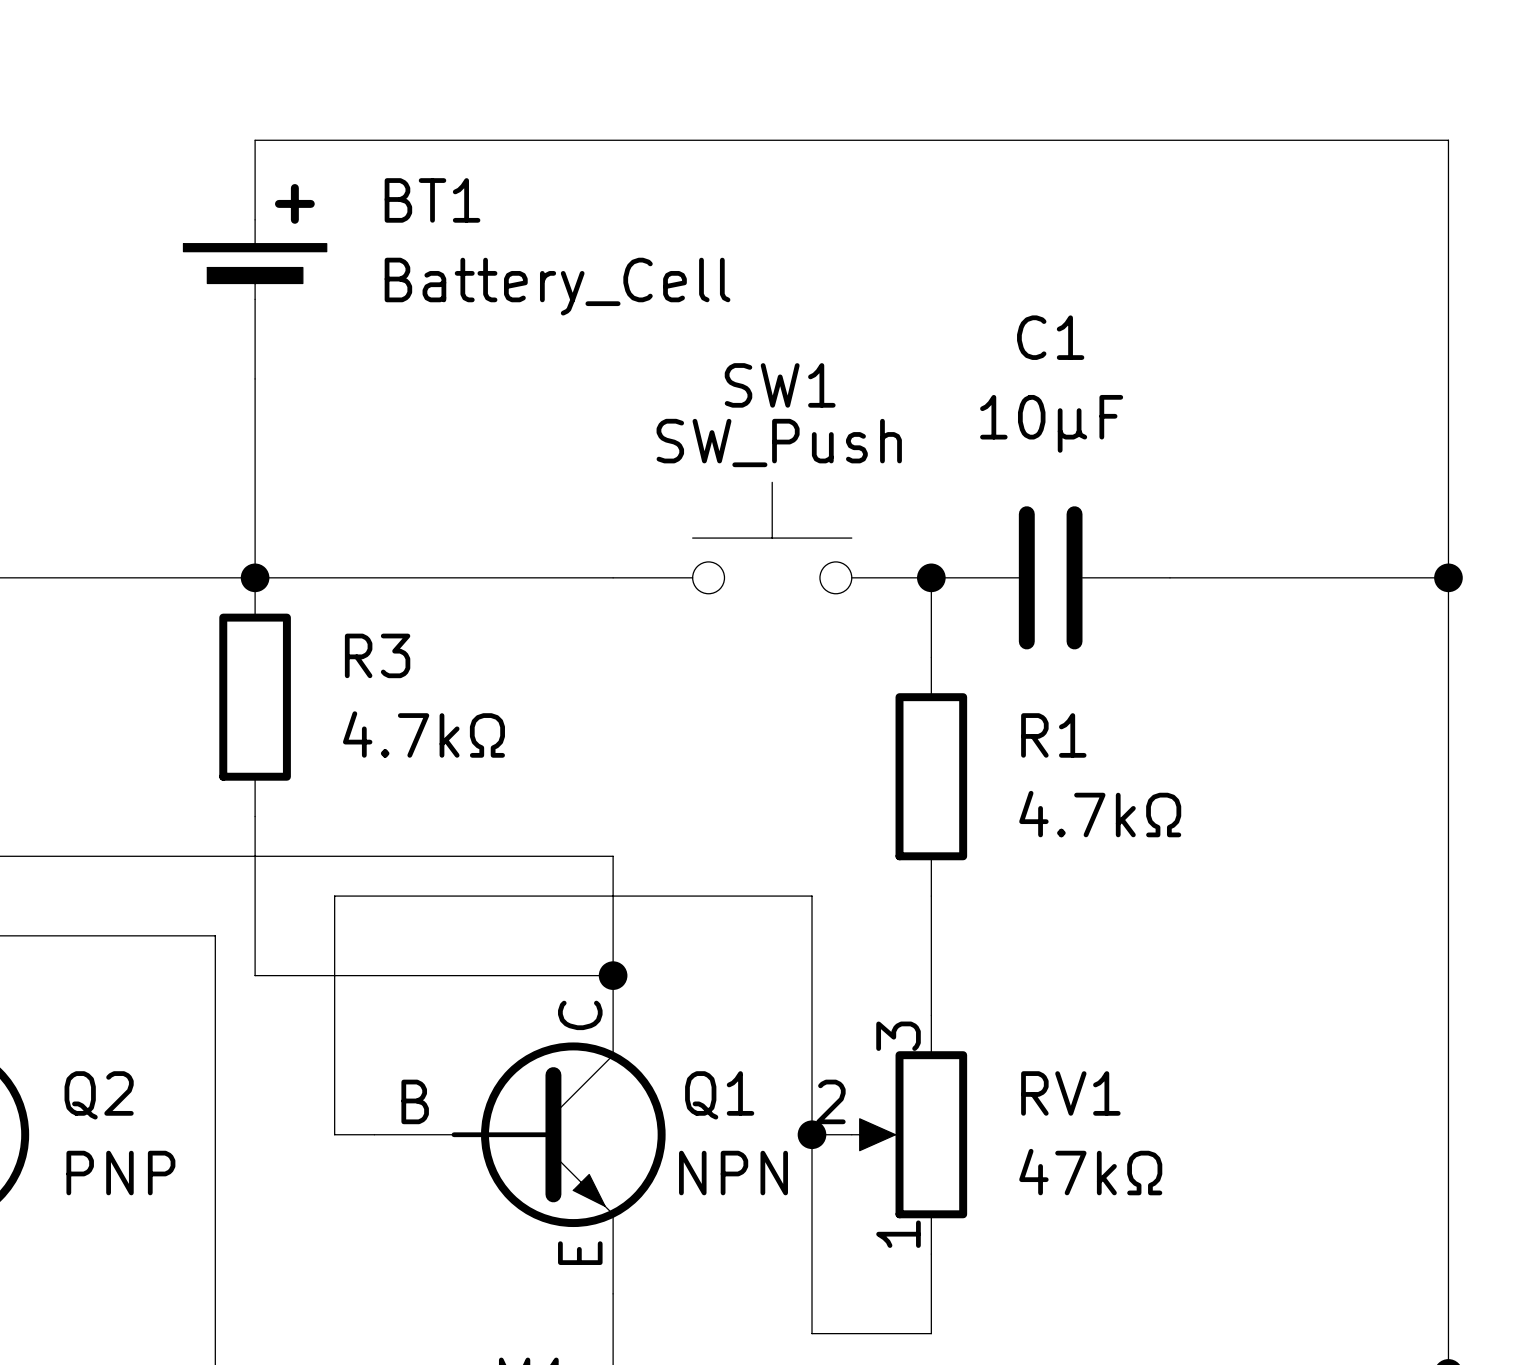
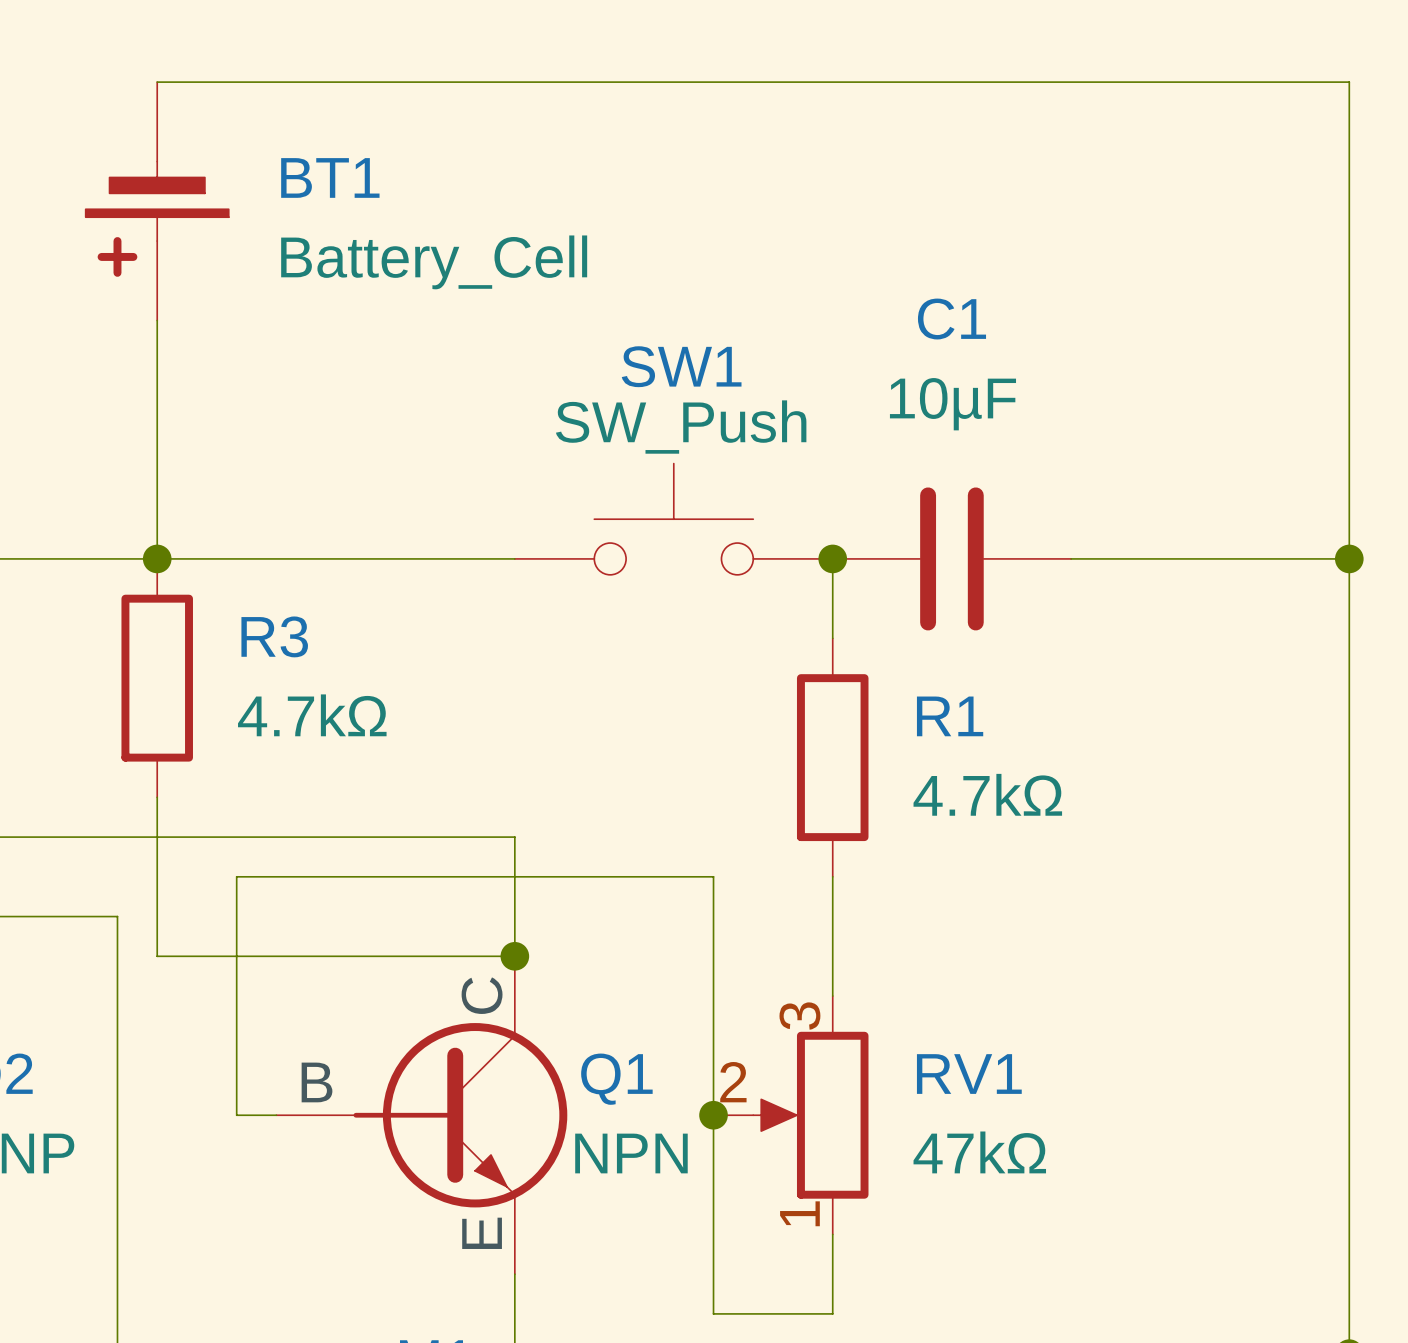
wire: (255, 140) (1448, 140) -> (157, 82) (1349, 82) (1349, 121)
BT1 rotation: 0° (255, 241) -> 180° (157, 219)

